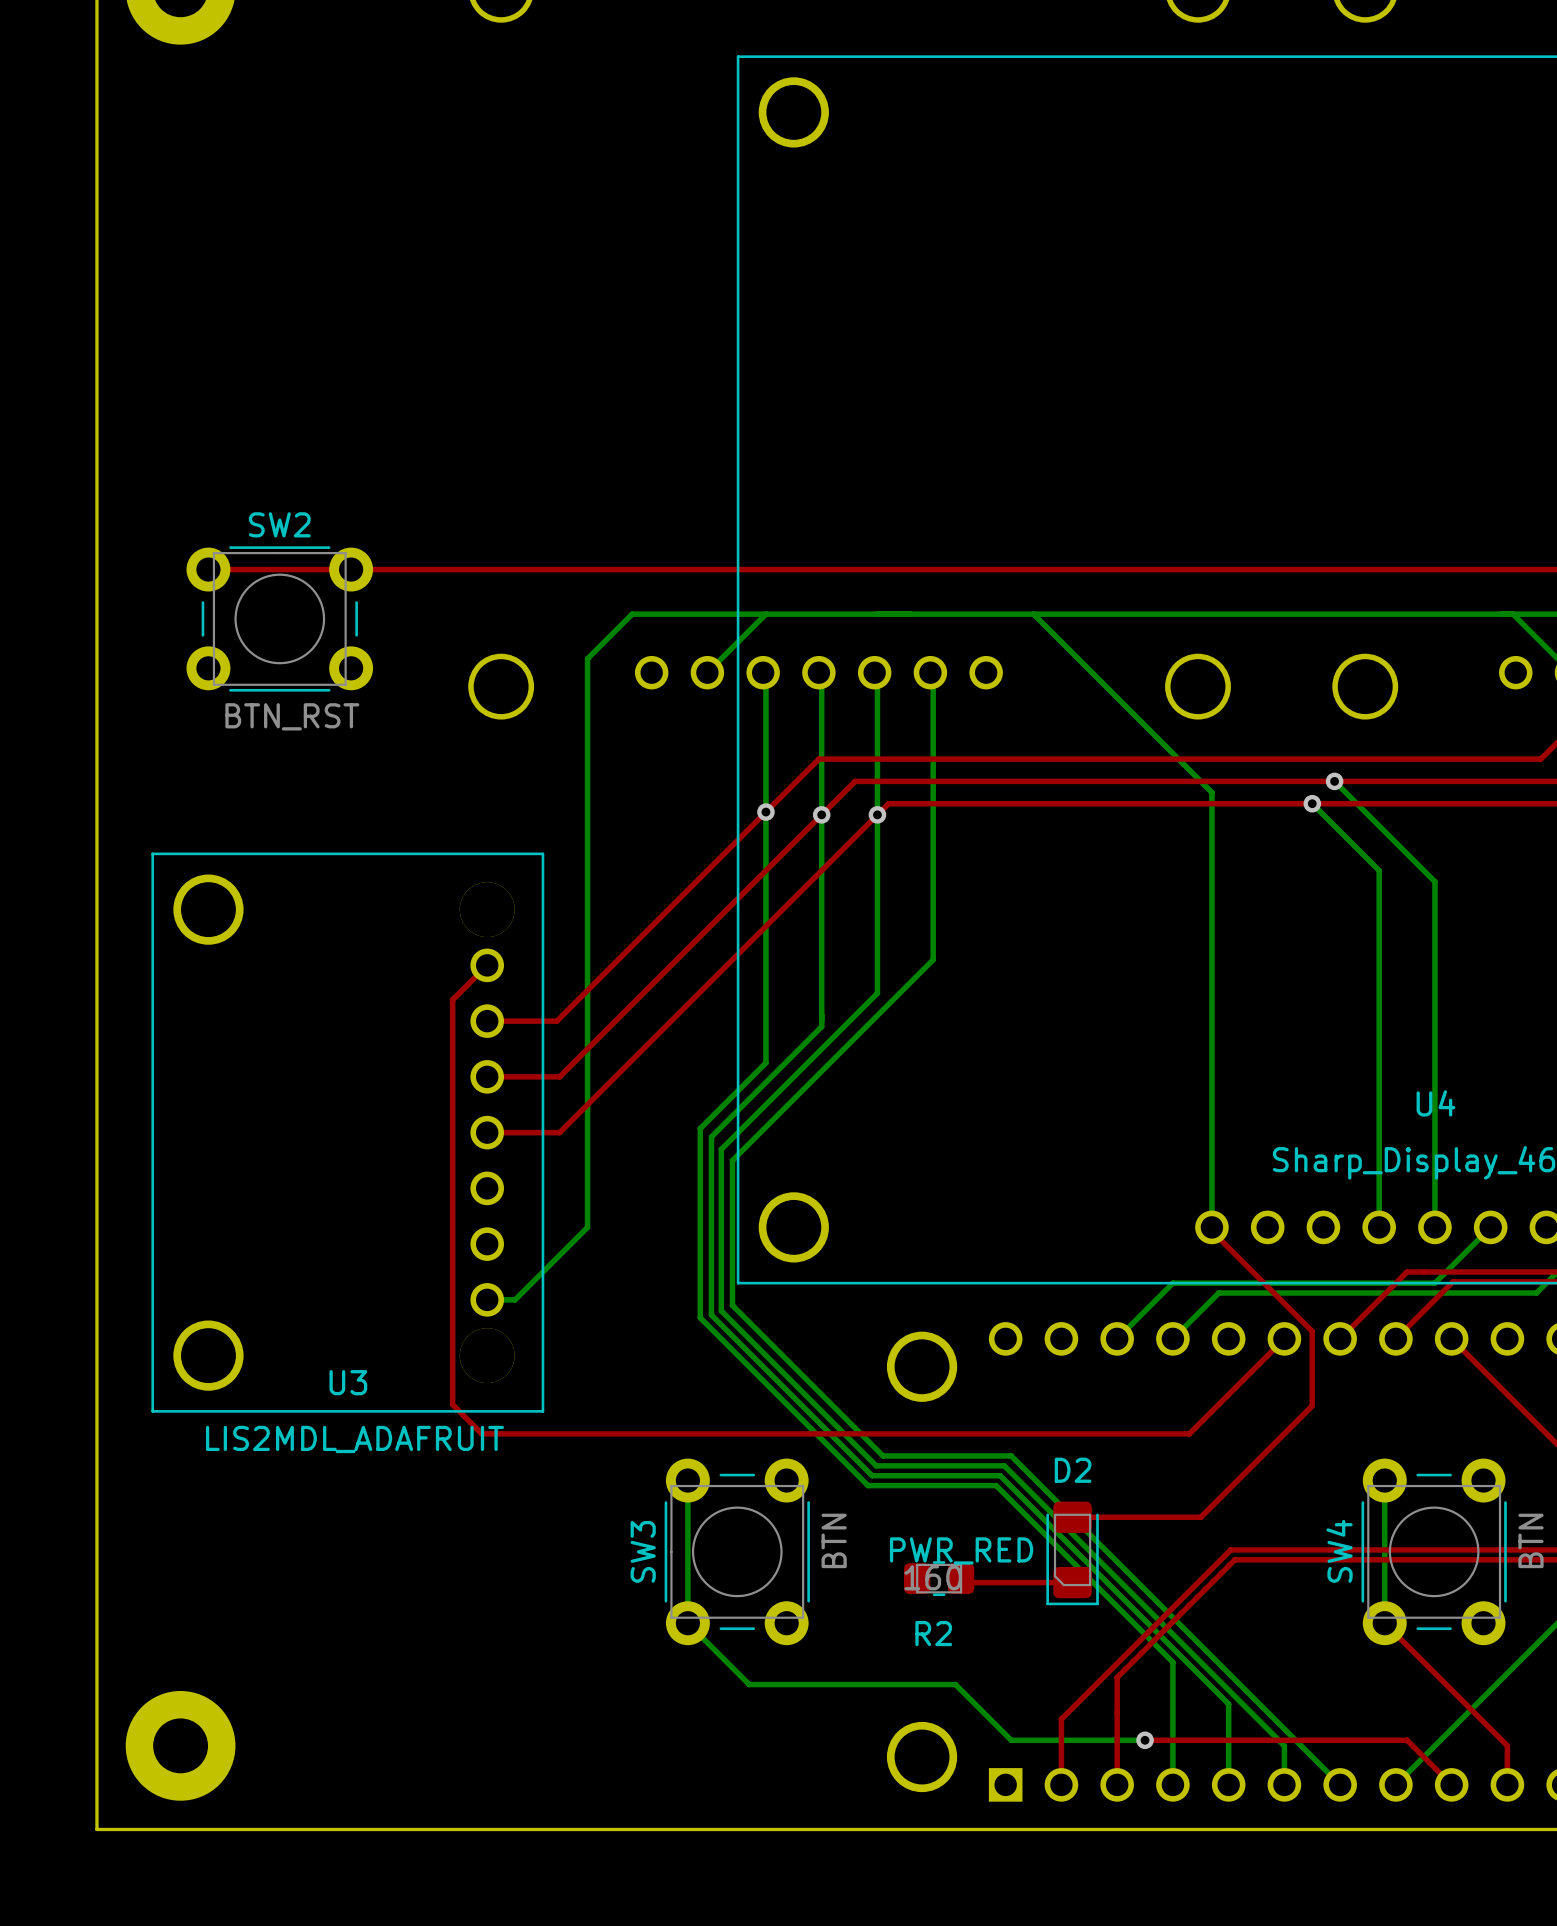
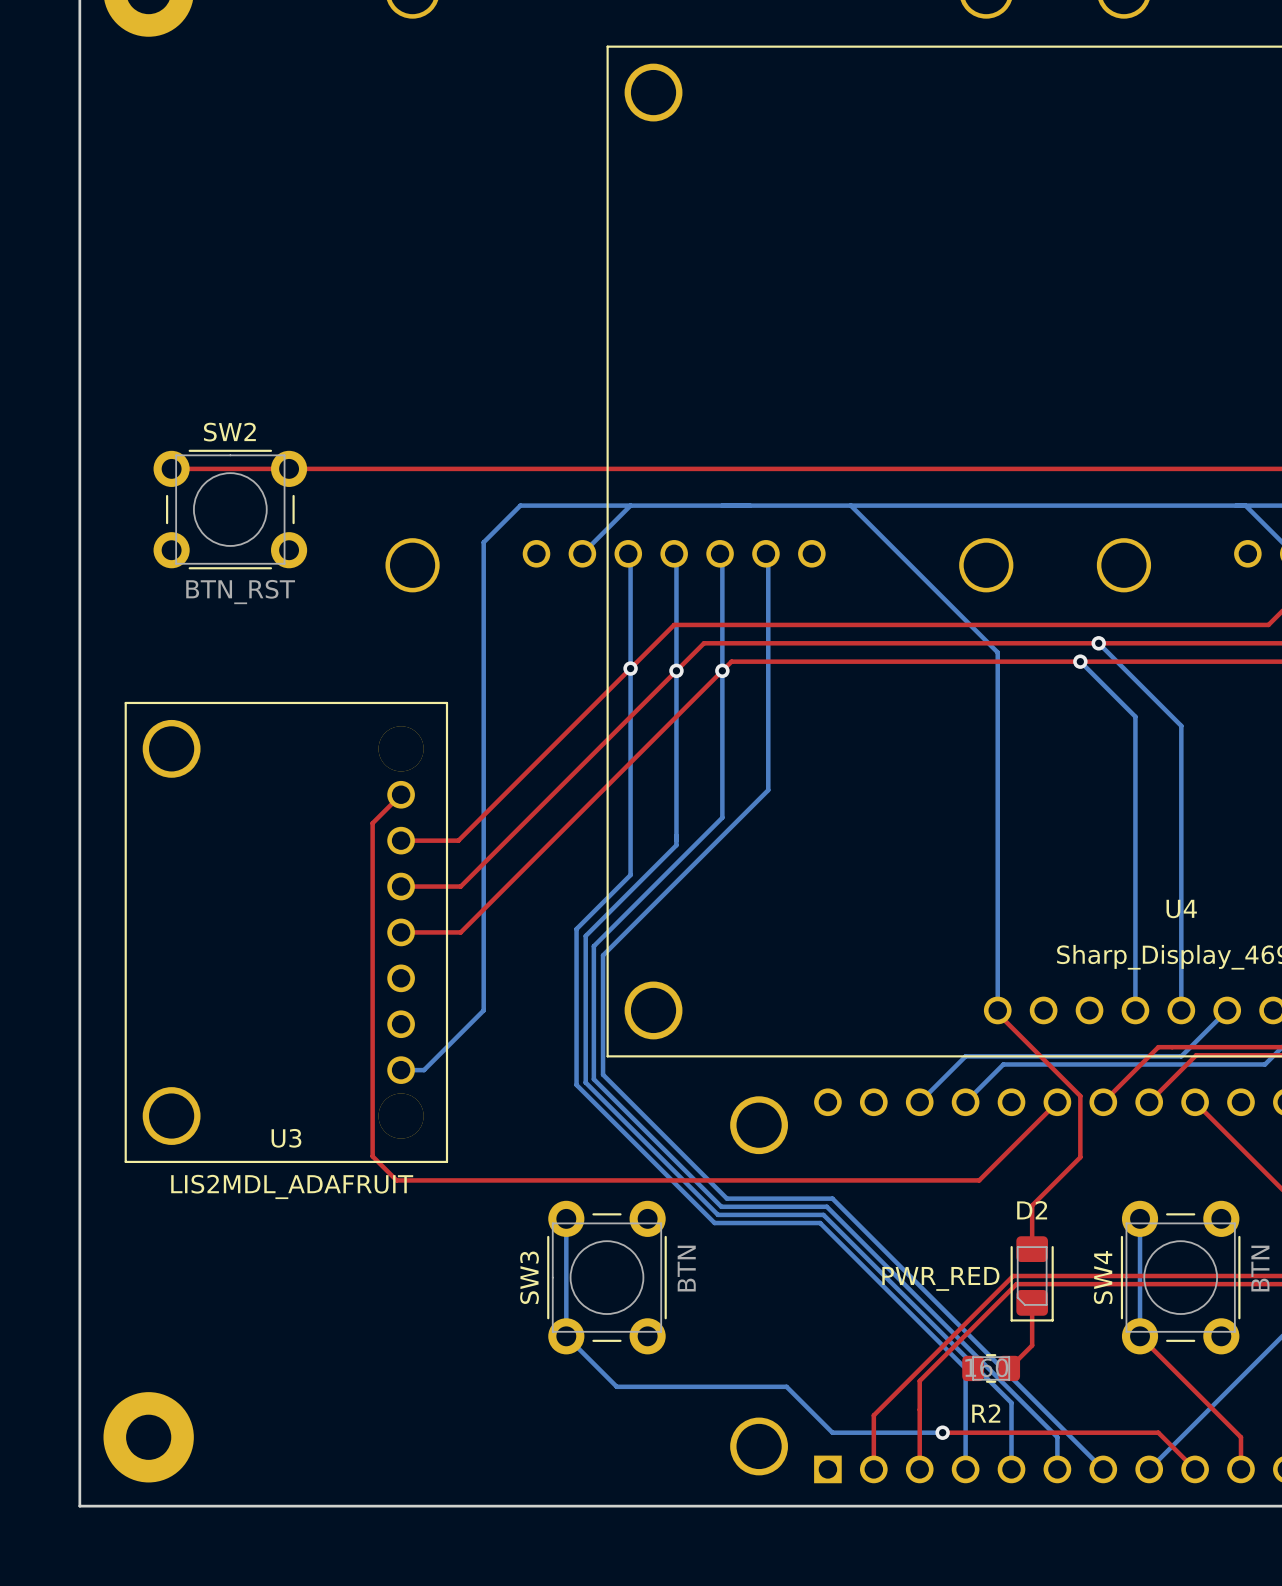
top track: (1253, 1464) (1200, 1517) (1072, 1517) -> (1032, 1205) (1032, 1249)
D2 position: (1072, 1553) -> (1032, 1278)
R2 position: (939, 1578) -> (991, 1368)
top track: (961, 1578) (965, 1582) (1072, 1582) -> none
top track: none -> (1032, 1302) (1032, 1345) (1009, 1368)

